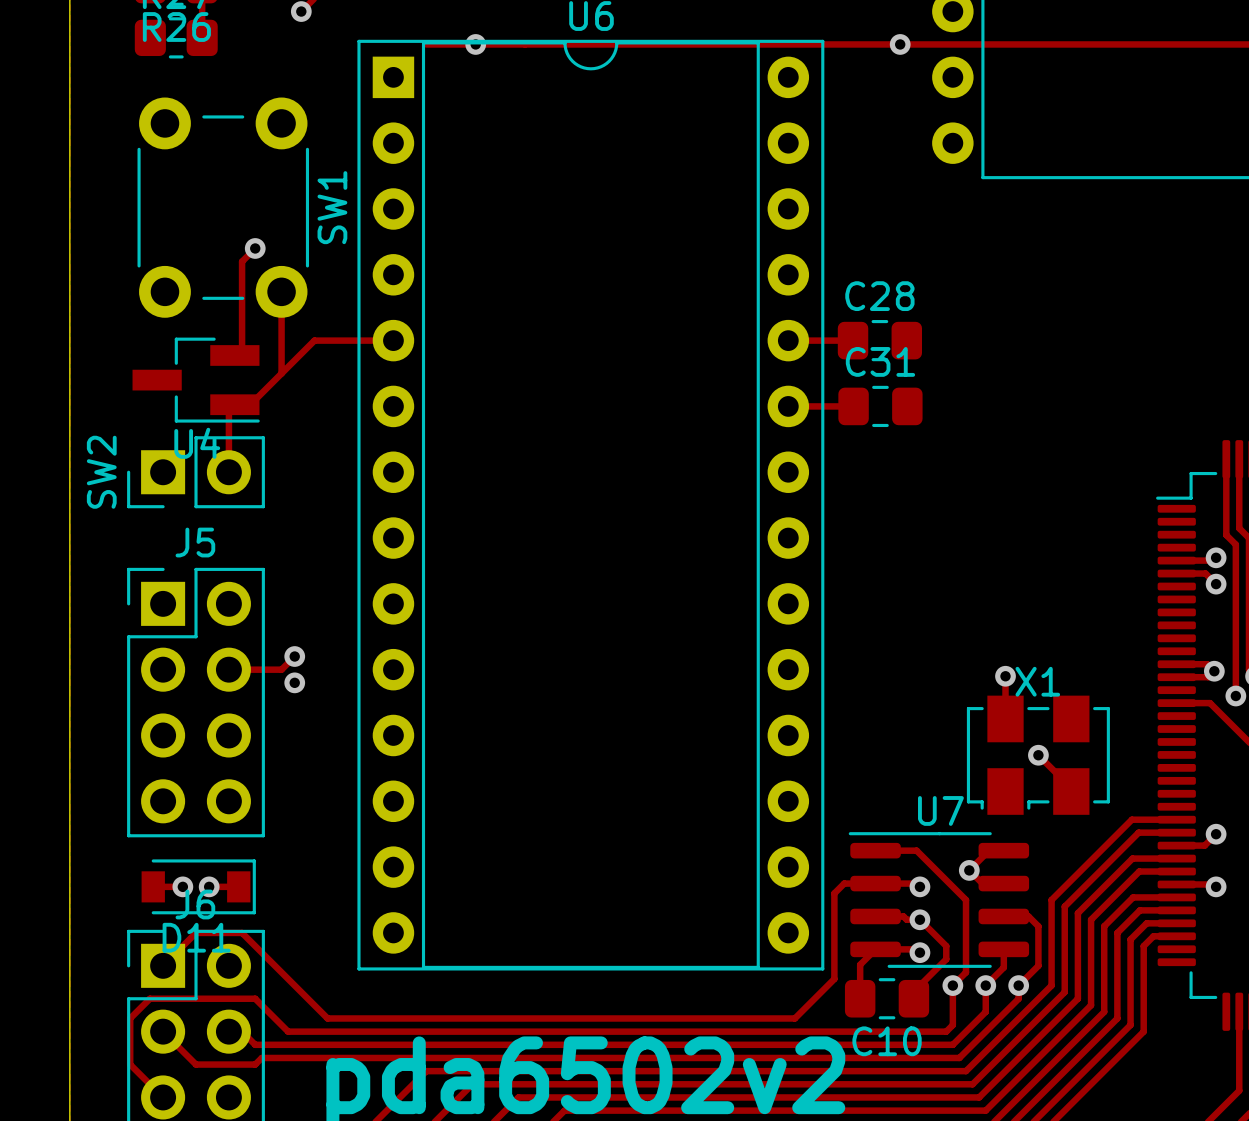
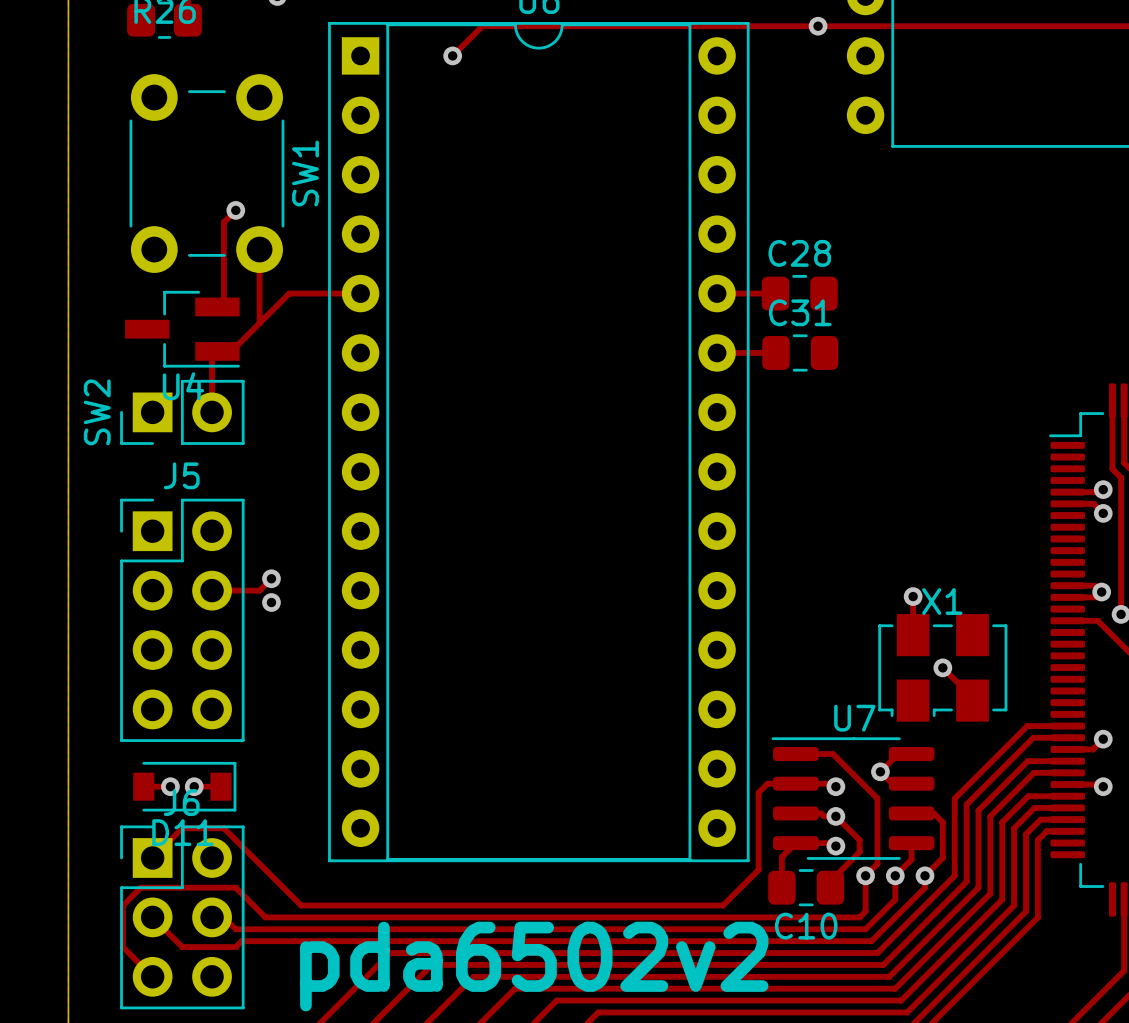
track: (426, 44) (528, 44) -> (452, 55) (482, 26)
via position: (475, 44) -> (452, 55)

